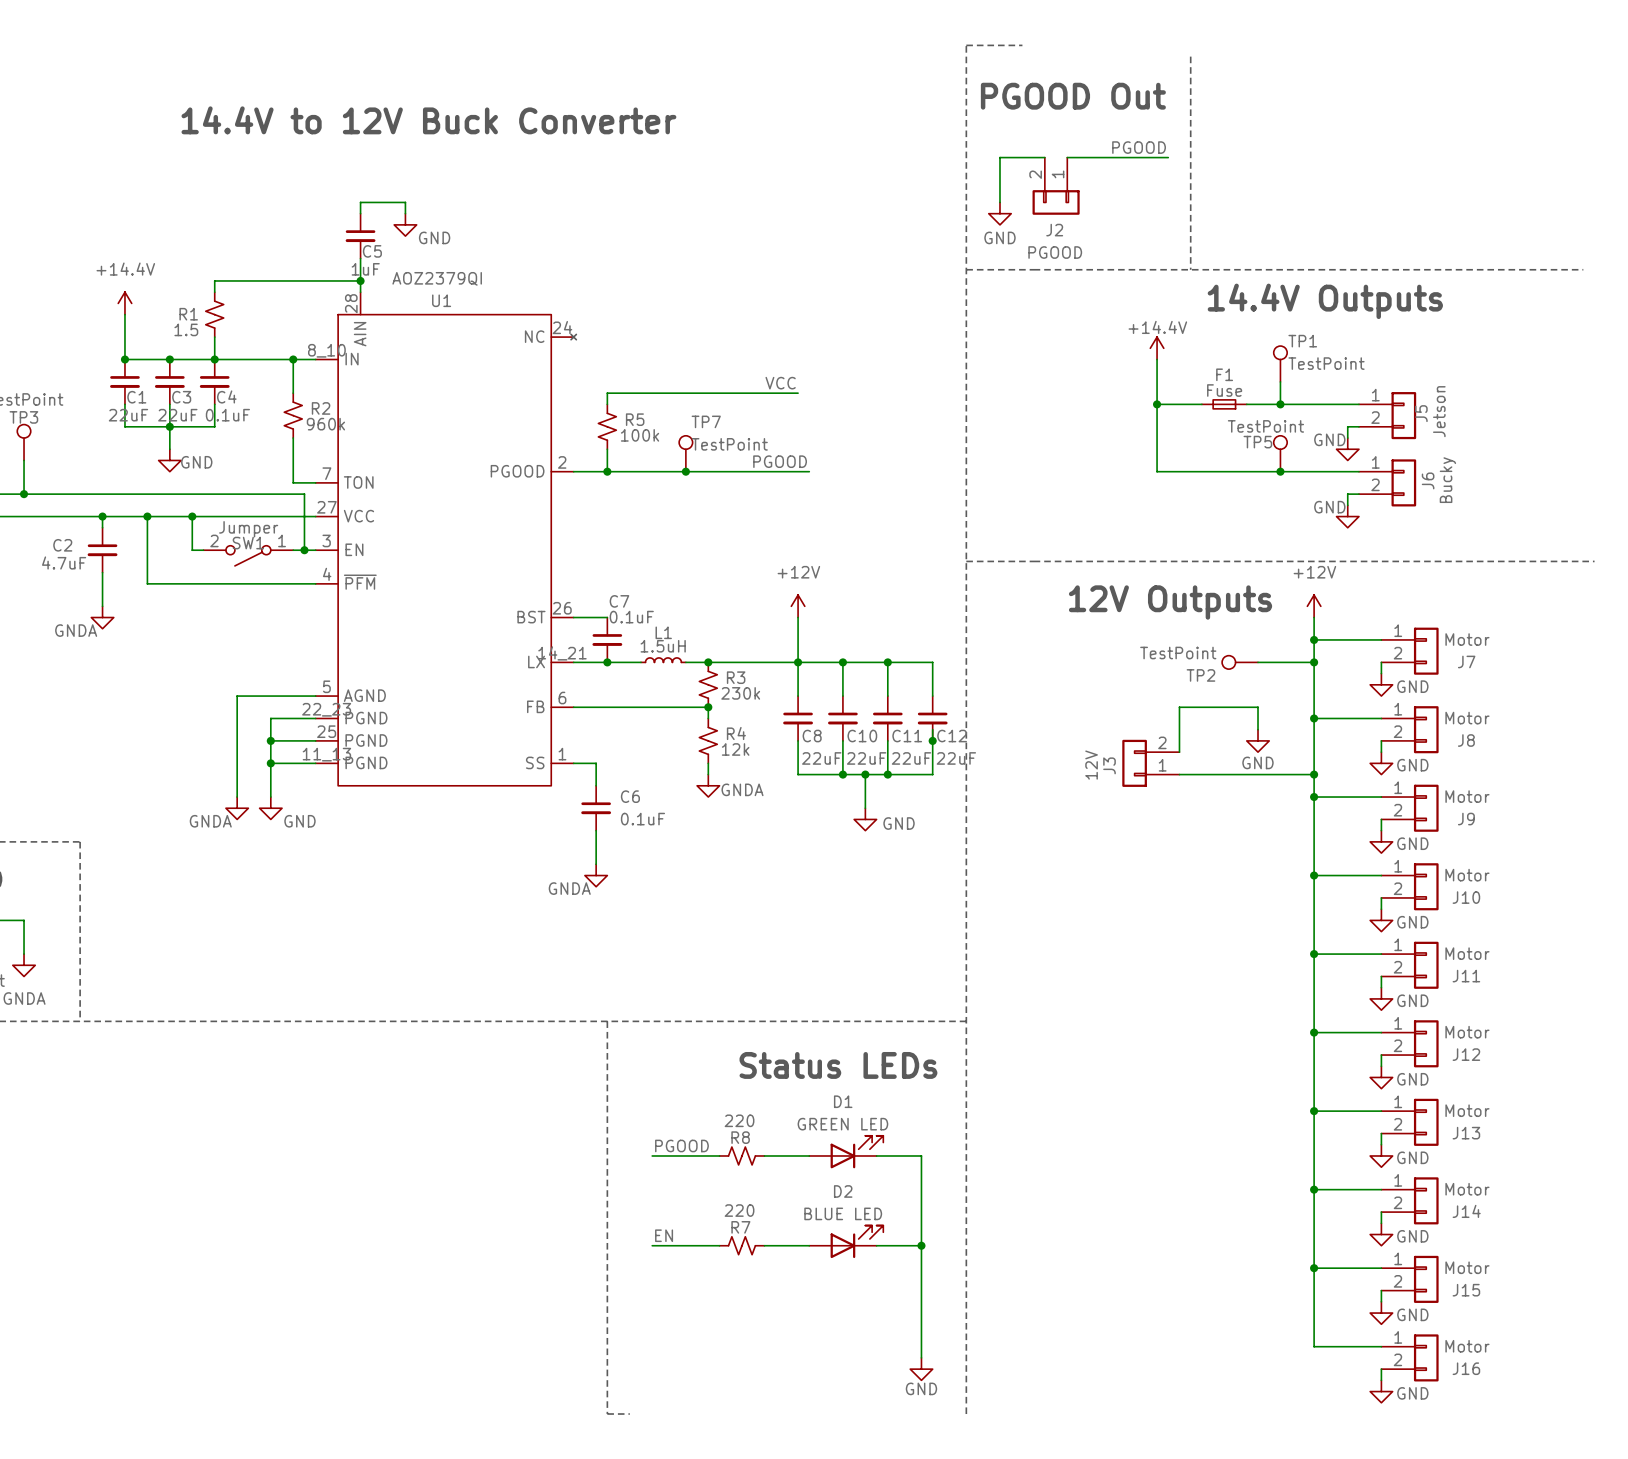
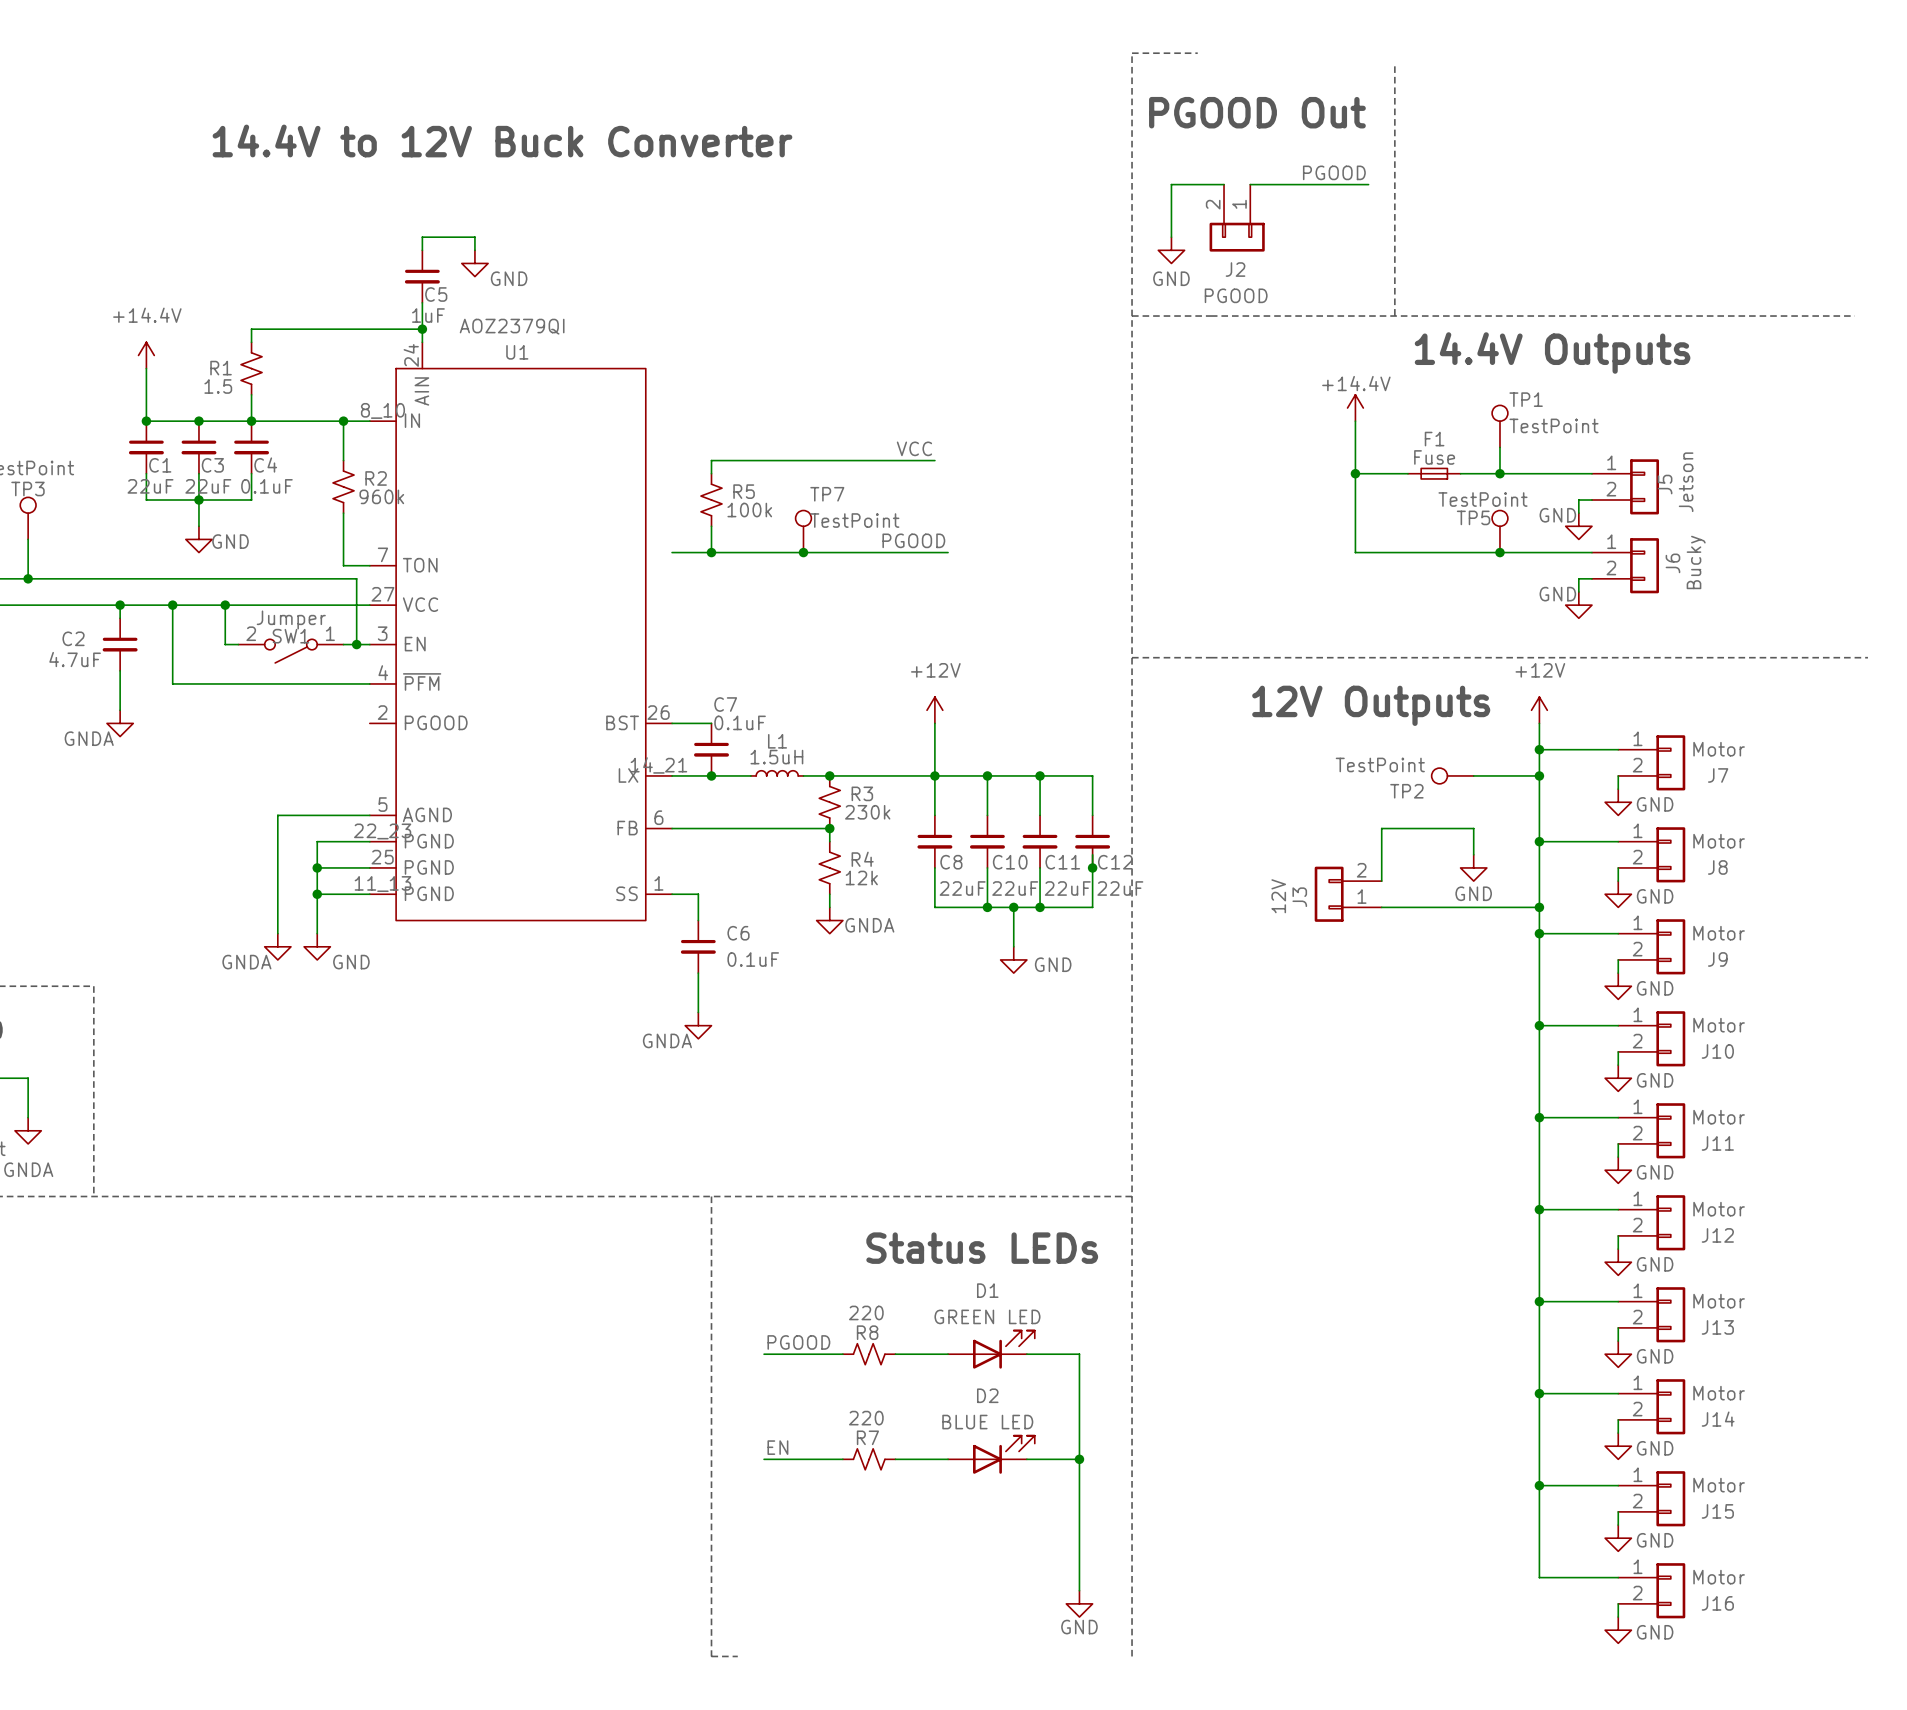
U1 symbol: [315, 292, 577, 786] -> [369, 342, 673, 921]

